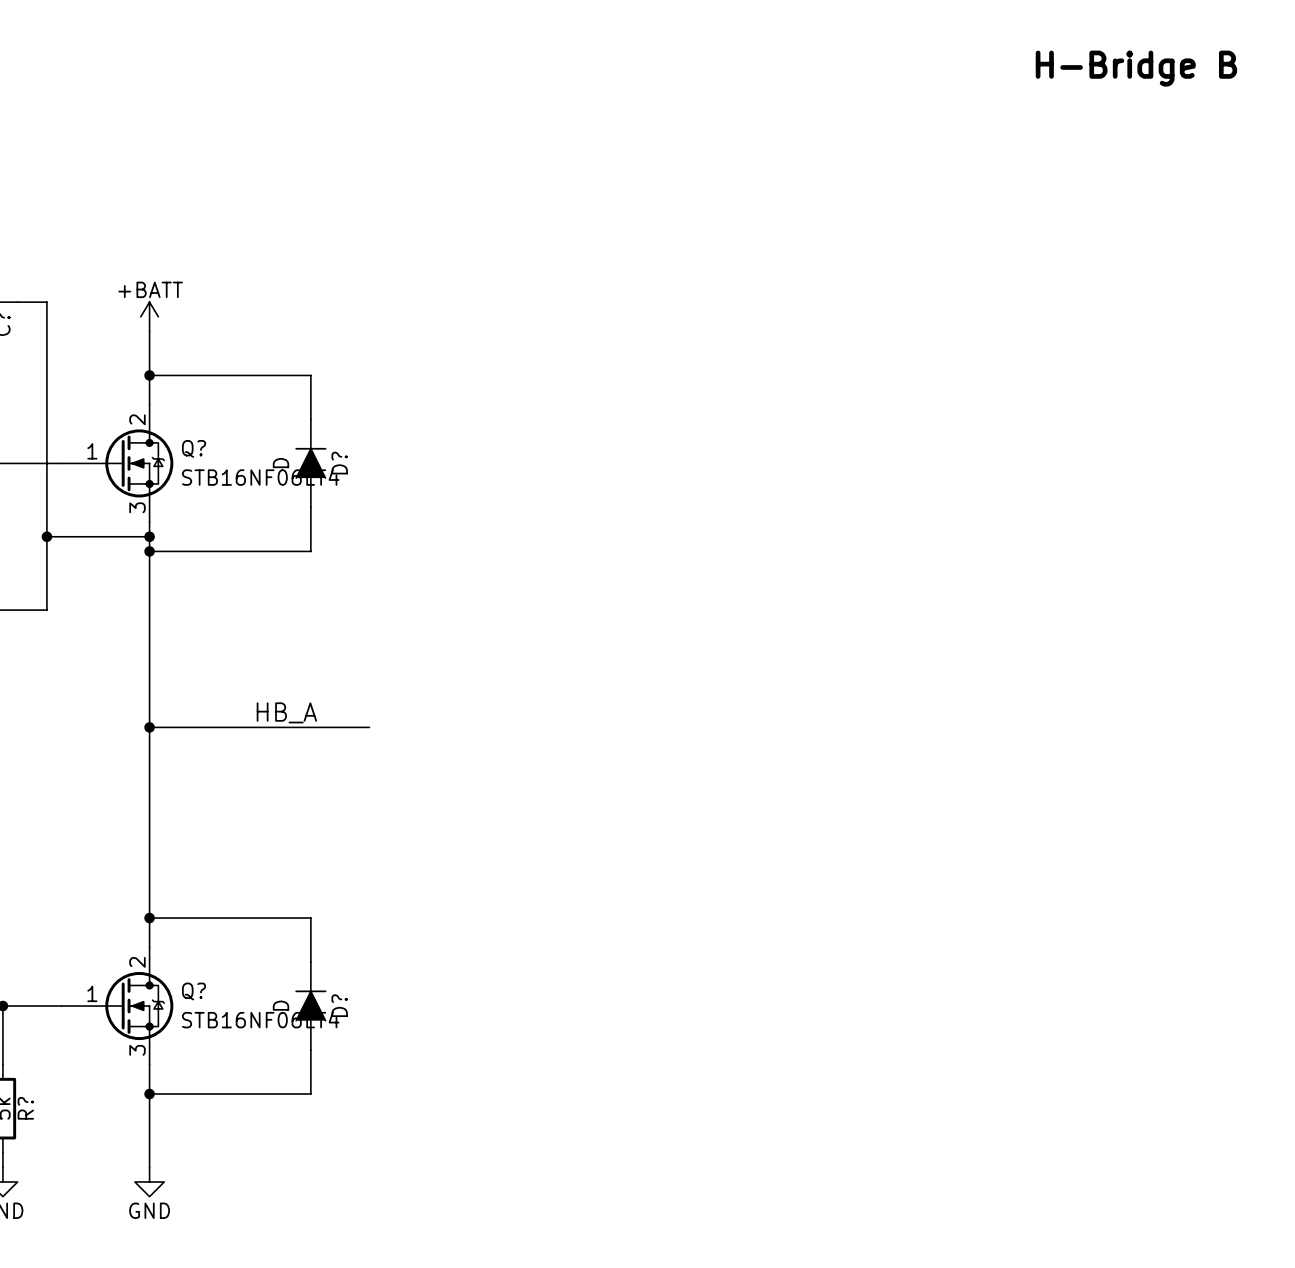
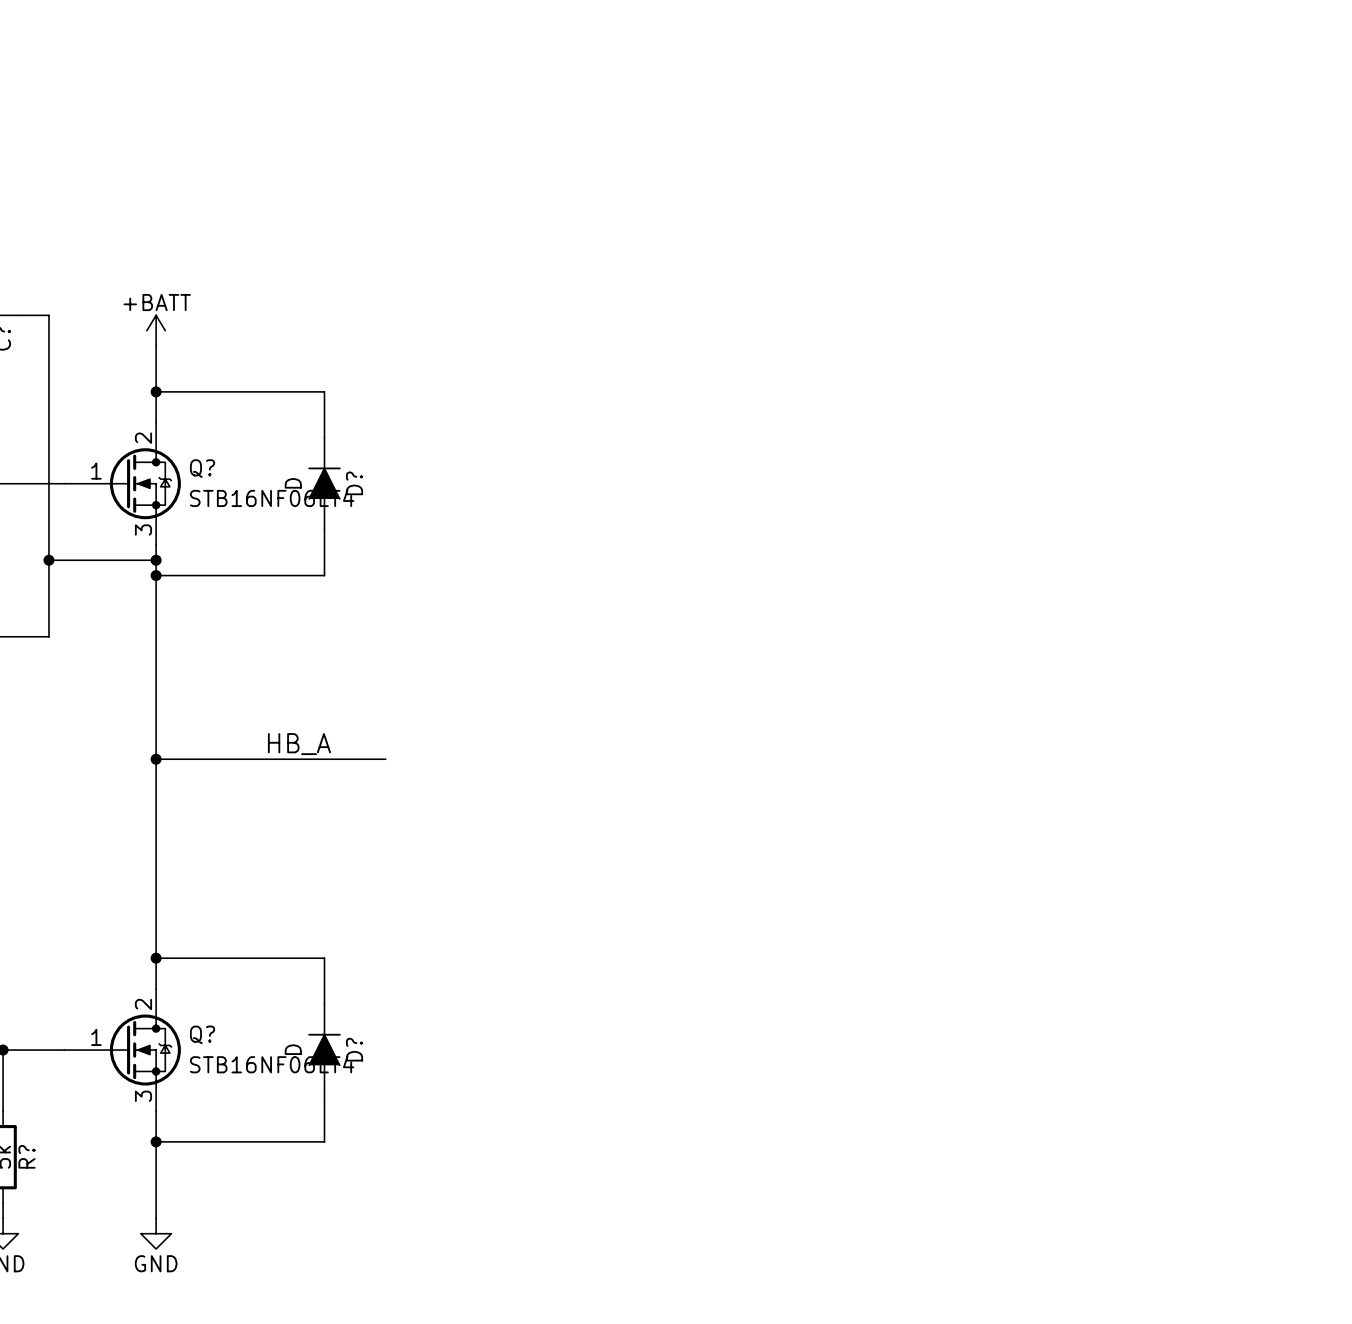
text: H-Bridge B (1136, 68) -> none

